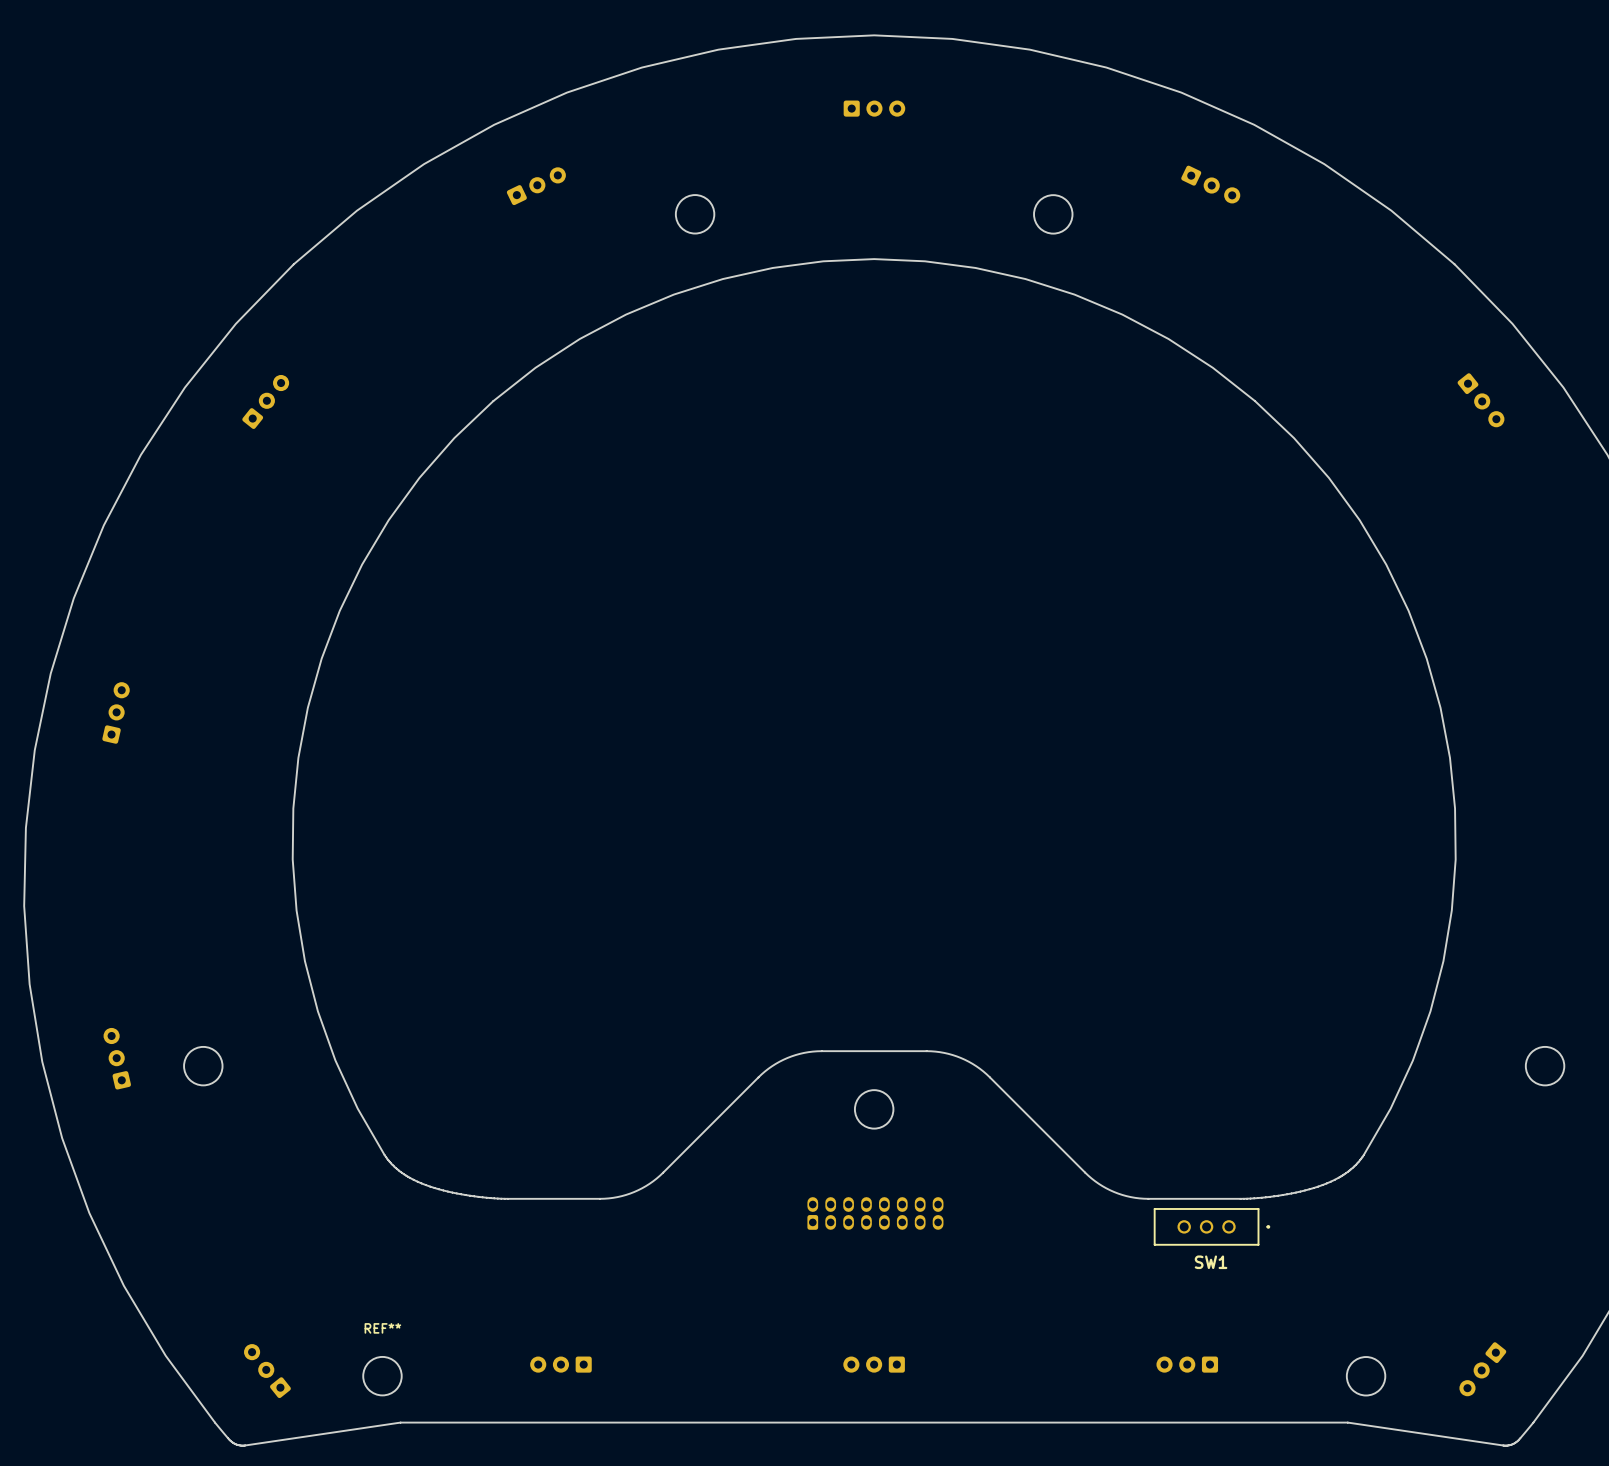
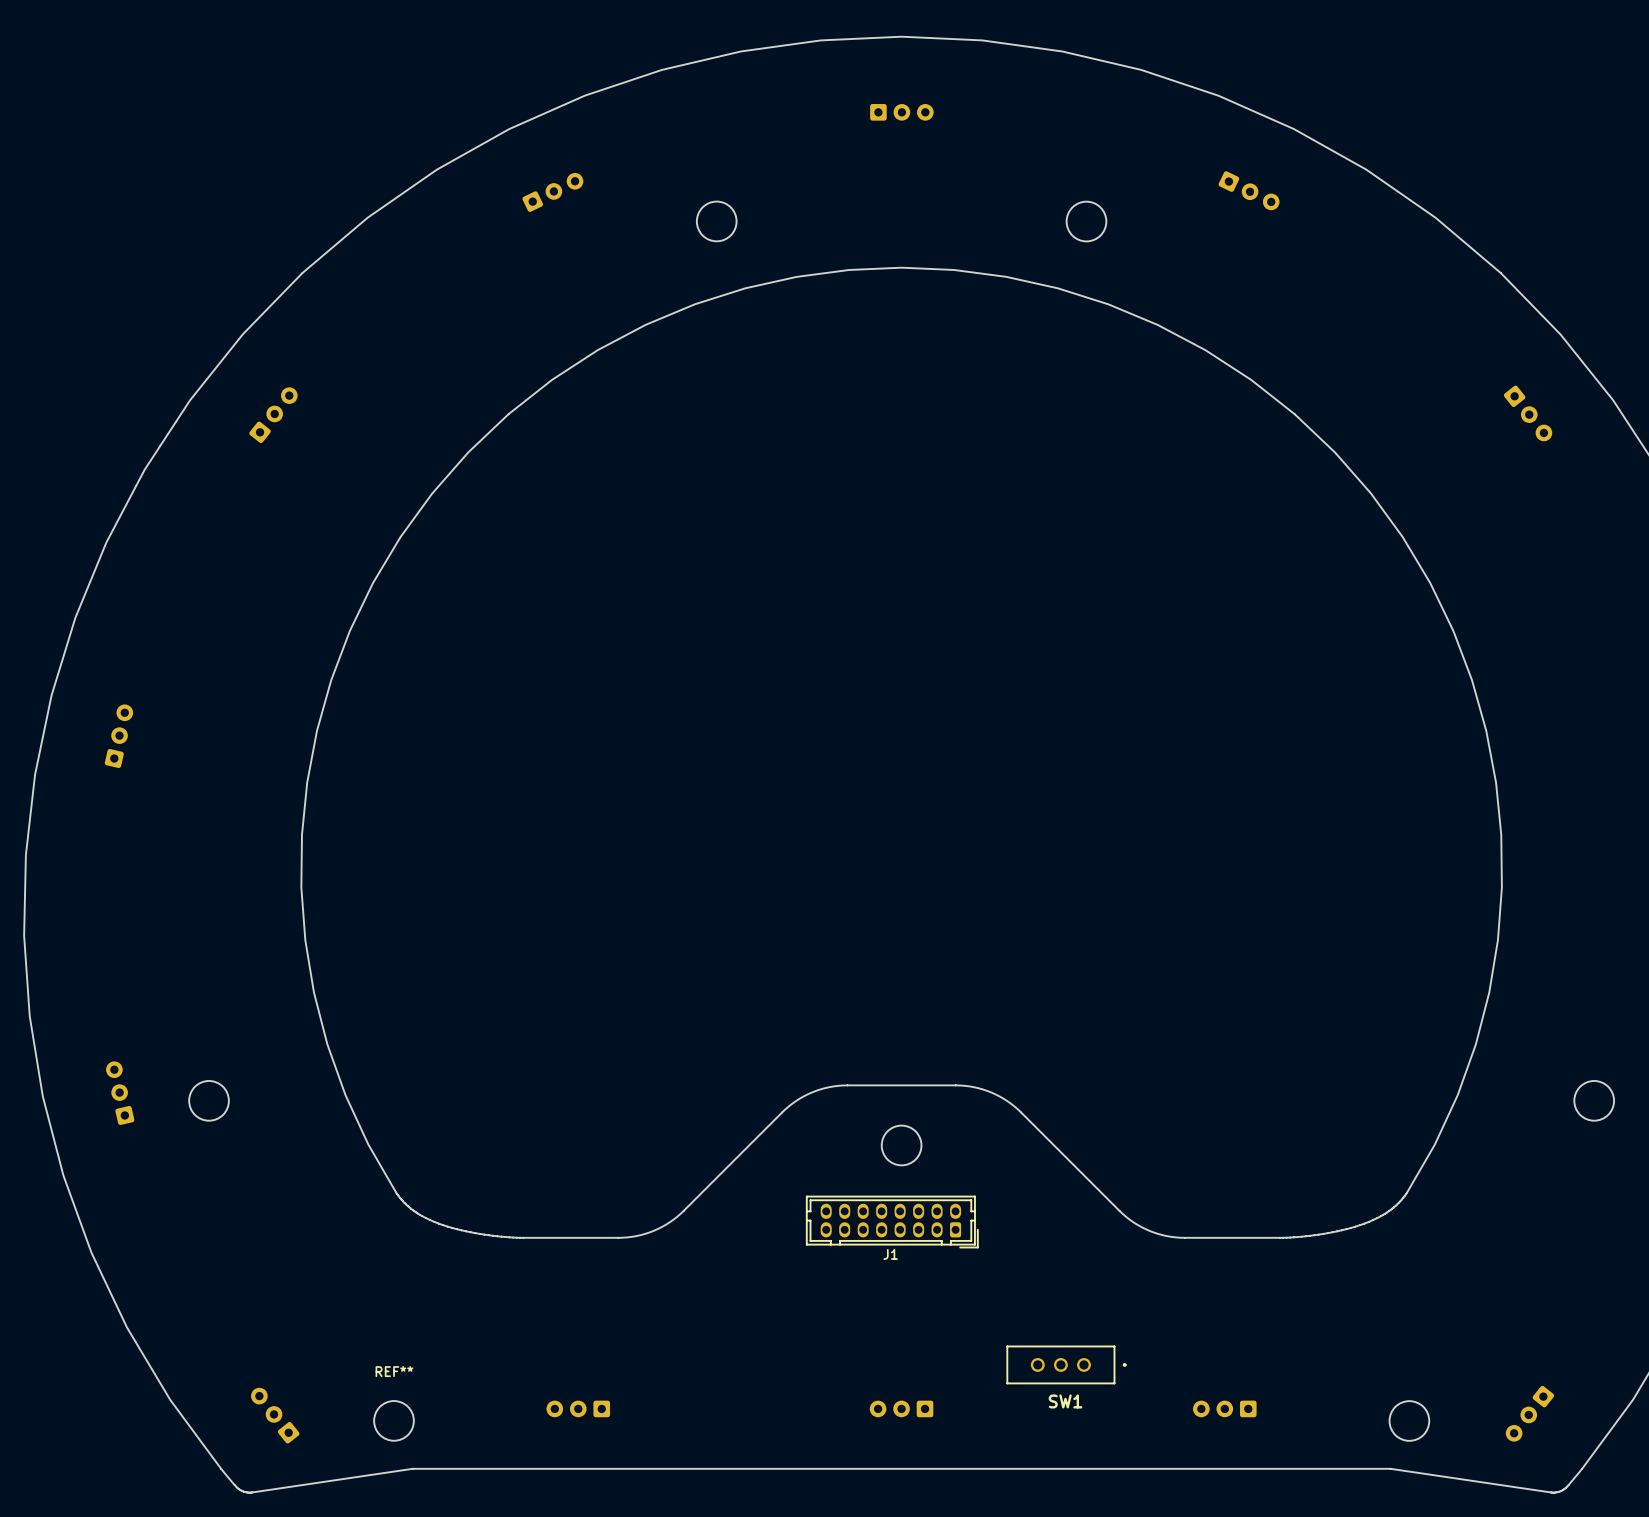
J1 side: top (875, 1213) -> bottom (892, 1222)
SW1 position: (1212, 1226) -> (1066, 1364)

